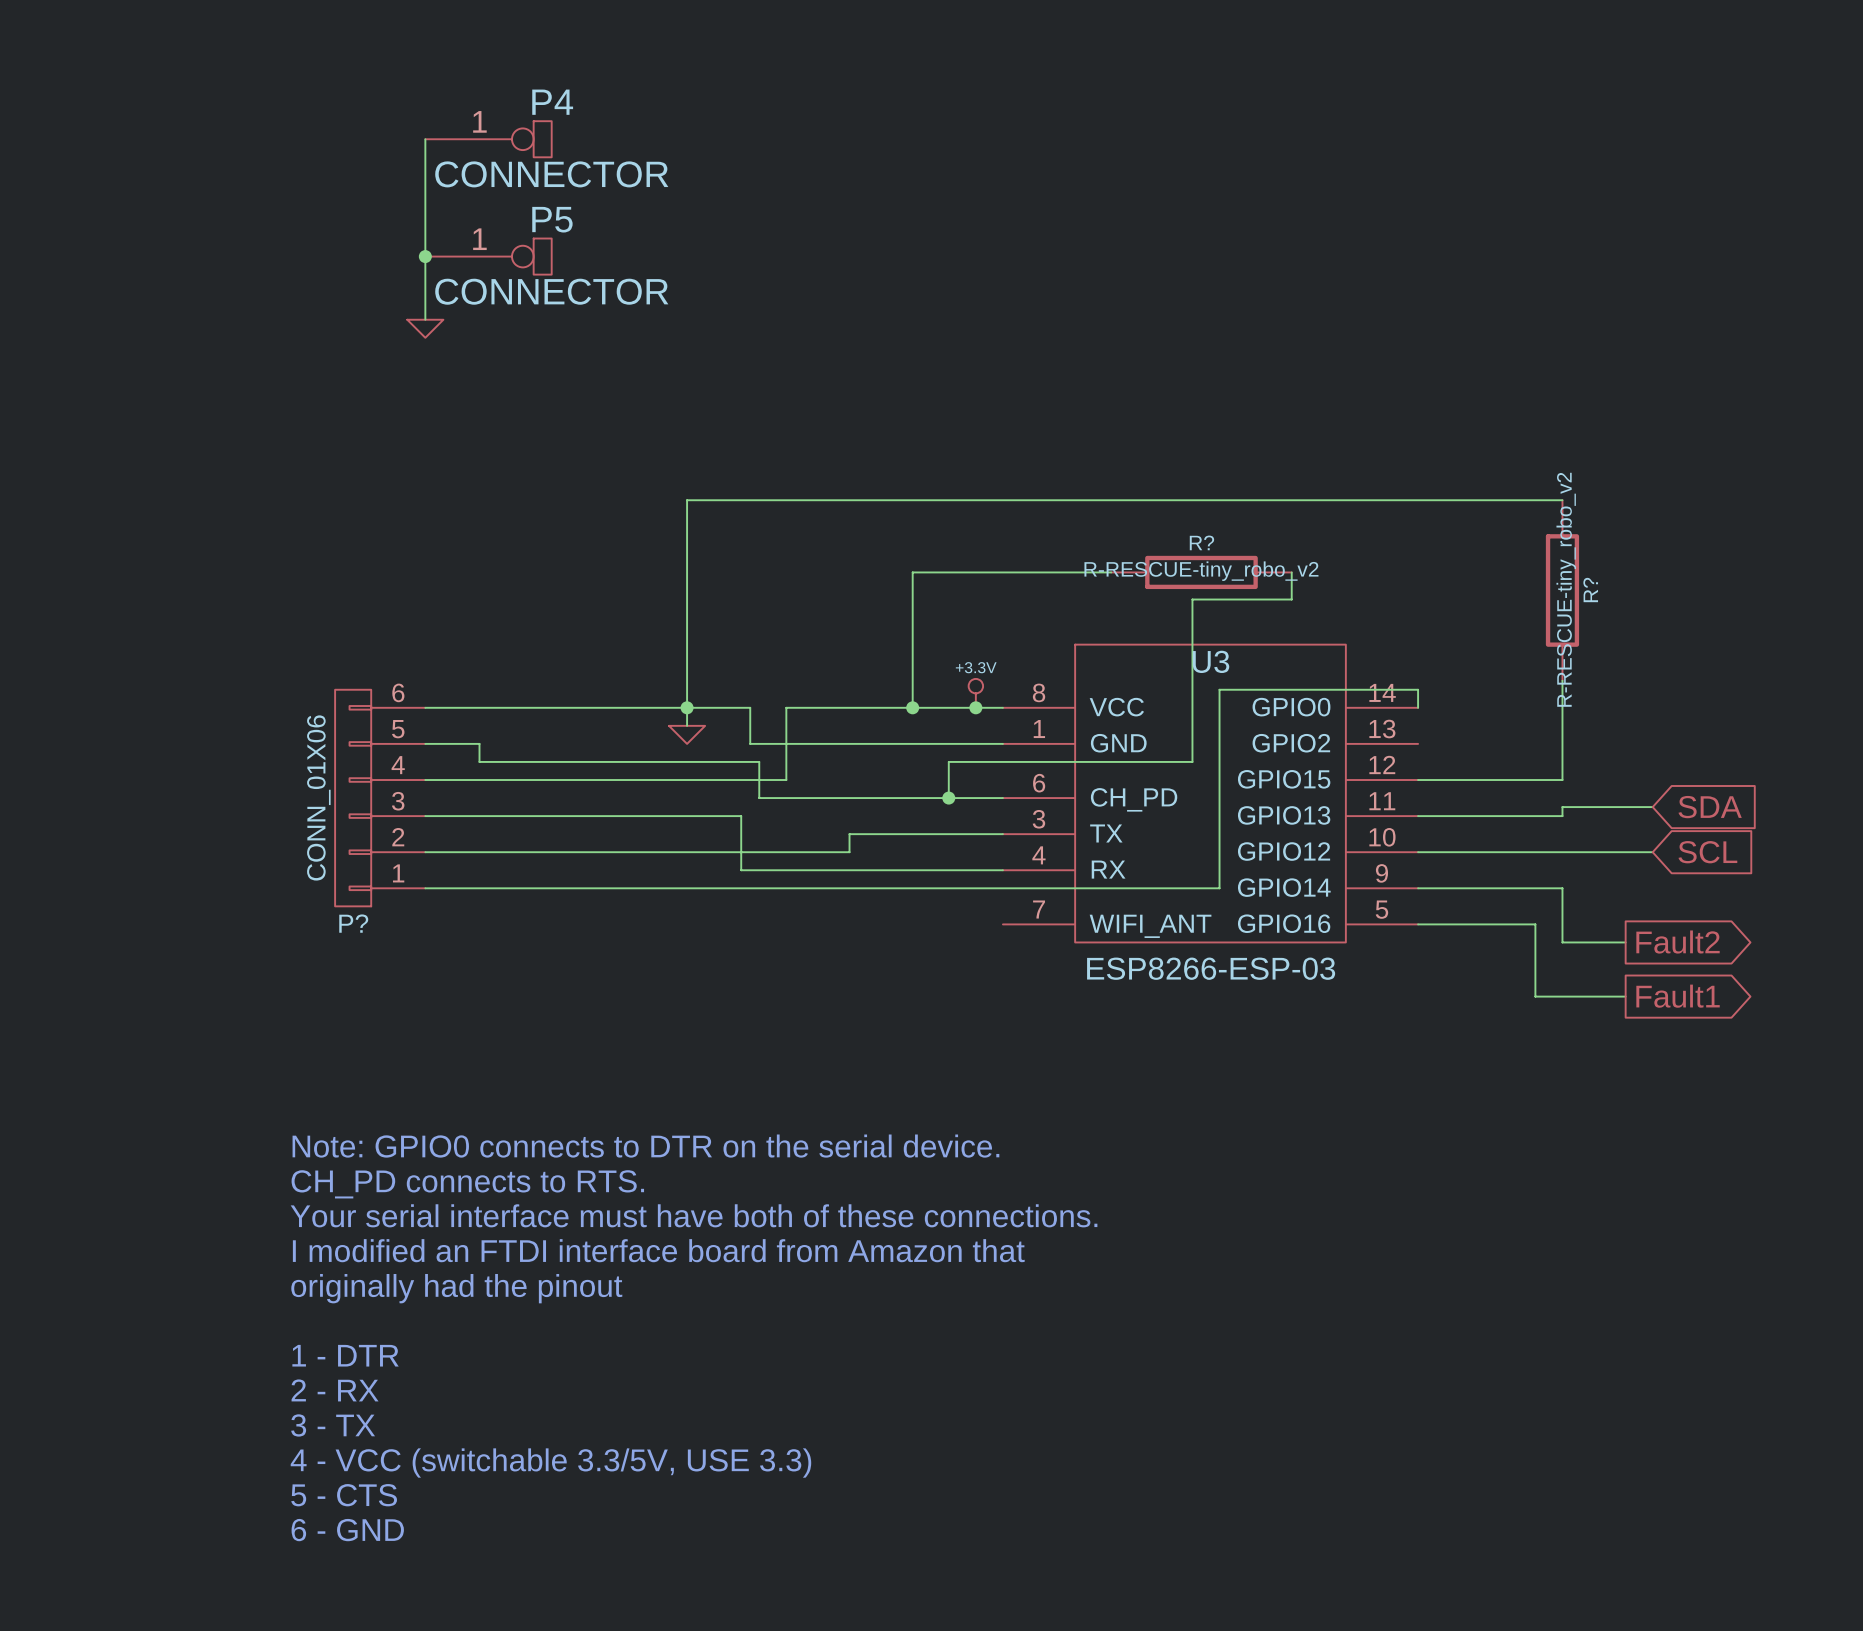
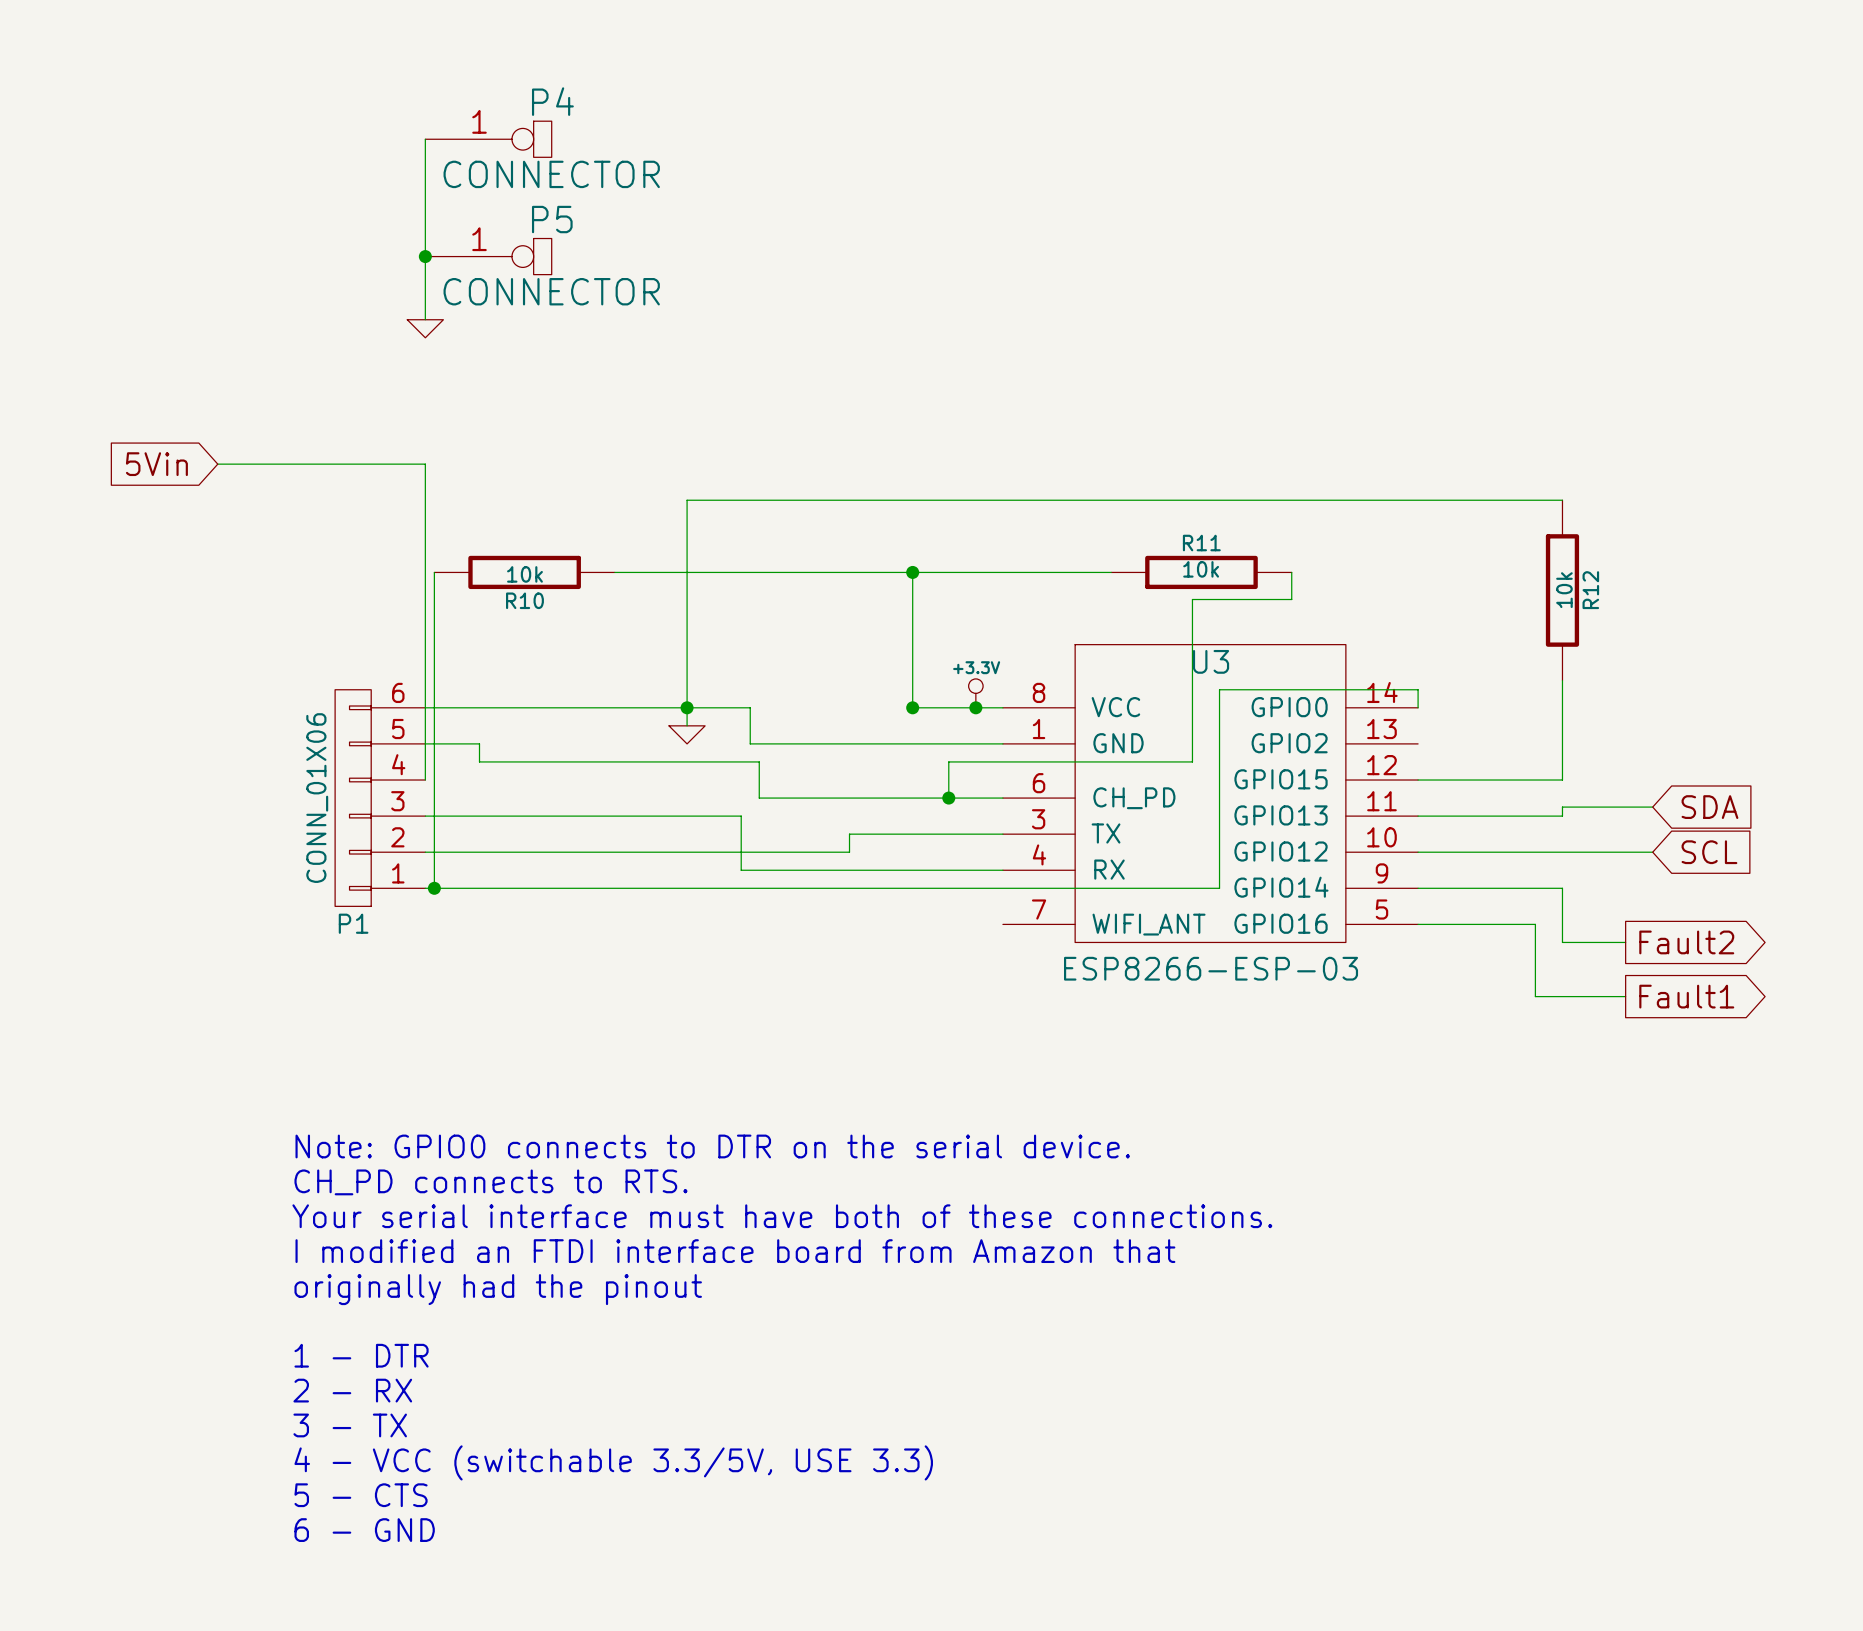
global label: none -> 5Vin (156, 464)
R? name: R? (1201, 542) -> R11 (1201, 543)
R? value: R-RESCUE-tiny_robo_v2 (1201, 571) -> 10k (1201, 569)
wire: none -> (434, 572) (434, 888)
R10: none -> 10k (524, 572)
wire: none -> (614, 572) (912, 572)
junction: none -> (912, 572)
R? value: R-RESCUE-tiny_robo_v2 (1566, 589) -> 10k (1564, 590)
R? name: R? (1590, 590) -> R12 (1590, 590)
wire: (912, 707) (786, 707) (786, 780) (425, 780) -> (217, 464) (425, 464) (425, 780)
junction: none -> (434, 888)
P? name: P? (353, 923) -> P1 (353, 923)

